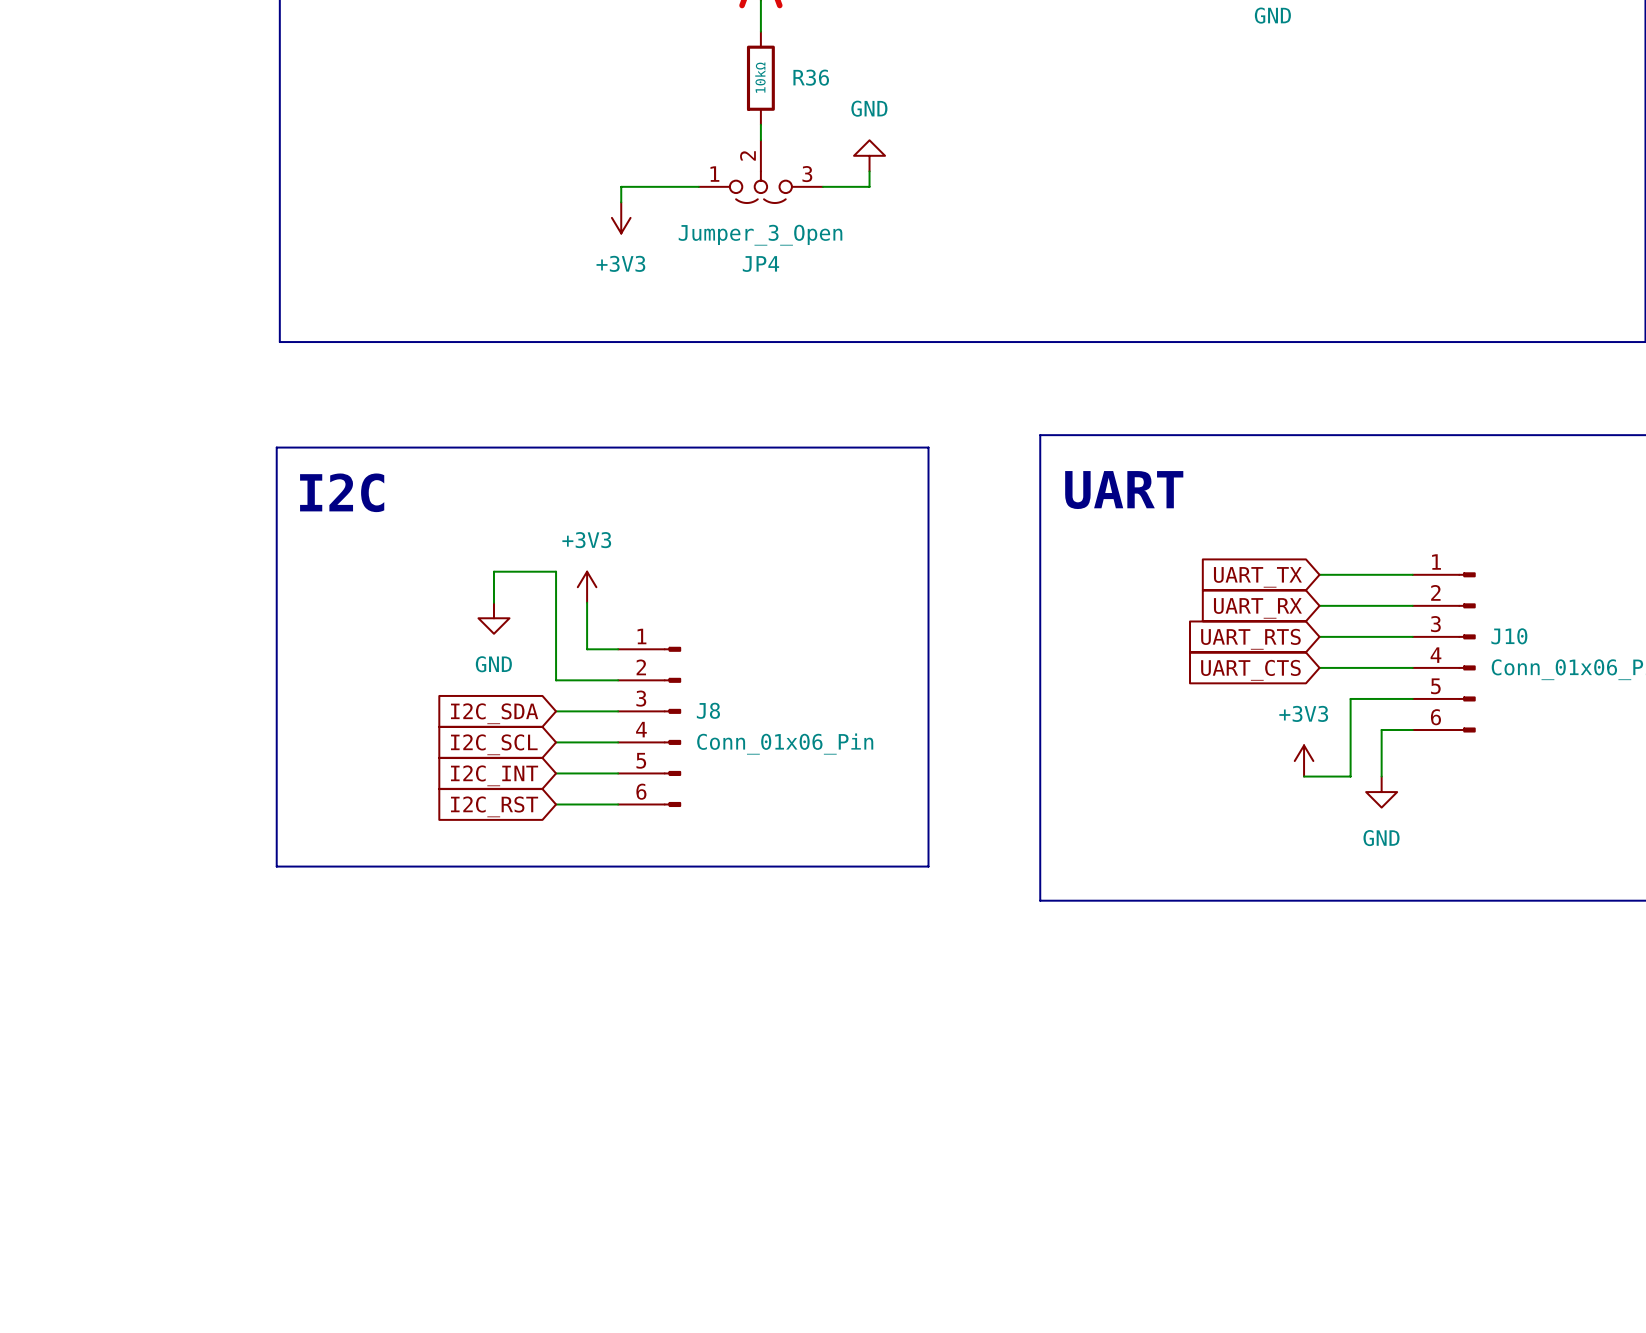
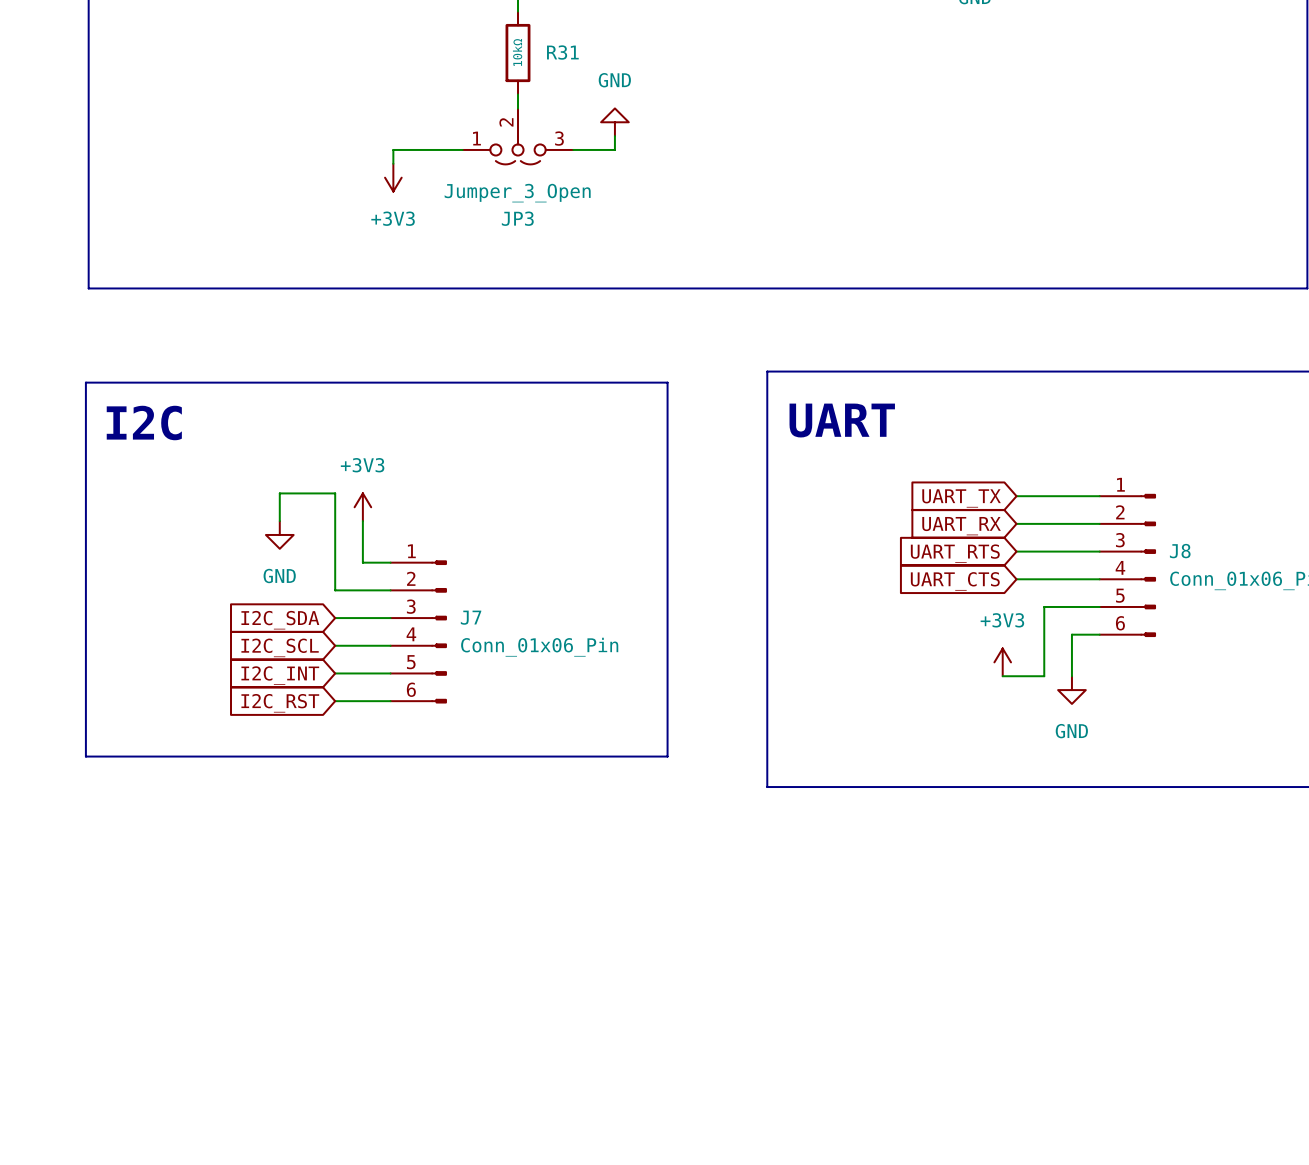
R36 name: R36 (811, 77) -> R31 (562, 52)
JP4 name: JP4 (760, 264) -> JP3 (517, 218)
J10 name: J10 (1509, 636) -> J8 (1180, 551)
J8 name: J8 (708, 710) -> J7 (471, 617)

